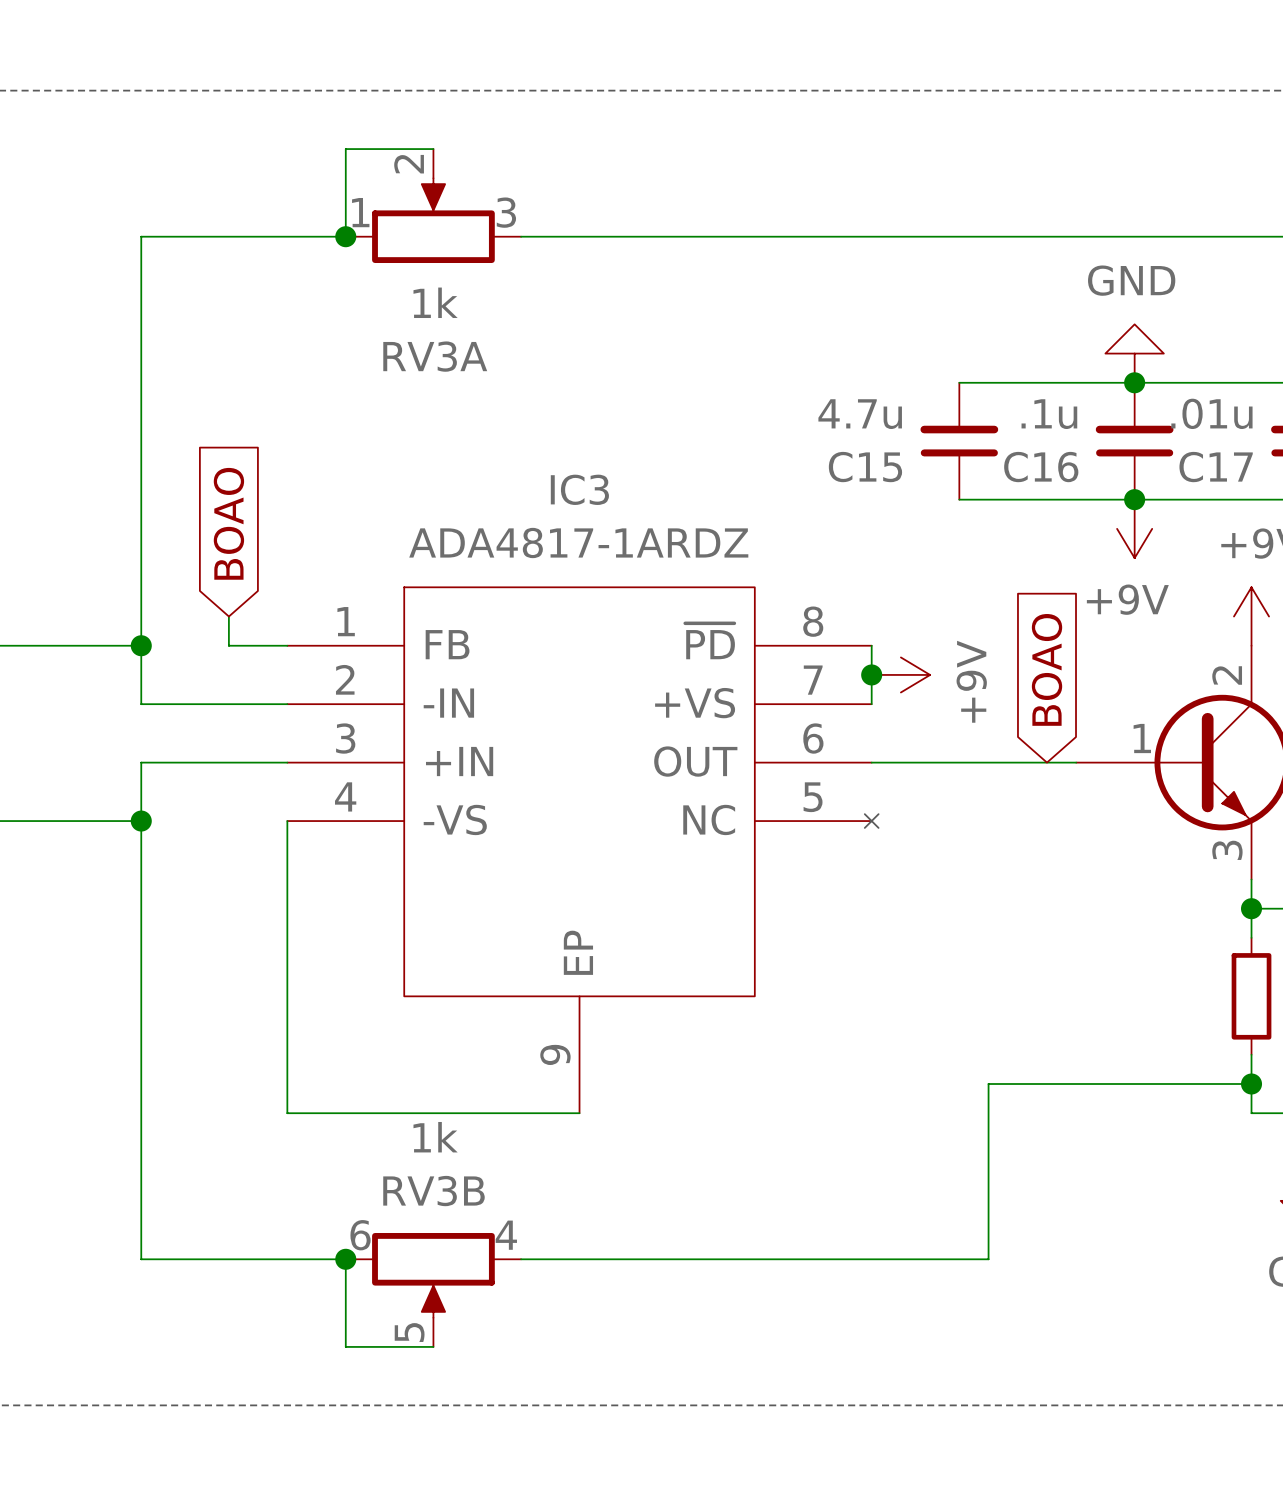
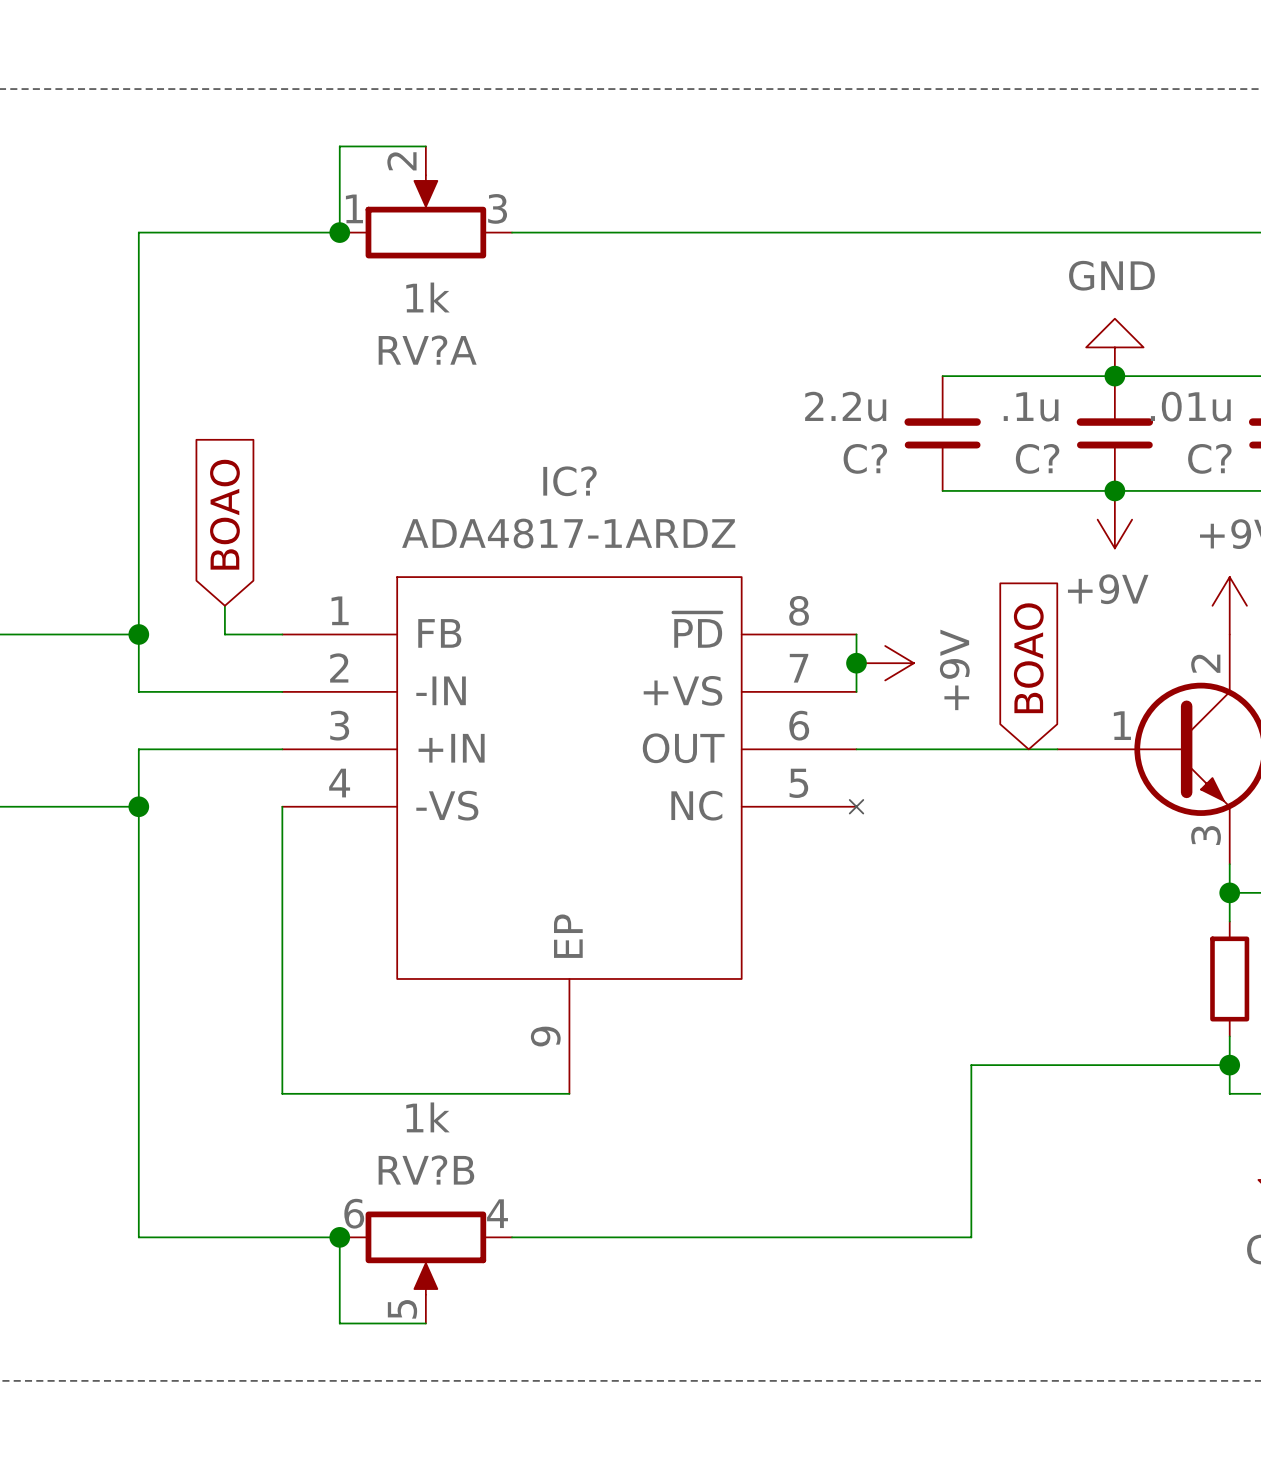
RV3A name: RV3A (435, 356) -> RV?A (427, 350)
C15 value: 4.7u (860, 414) -> 2.2u (845, 406)
C15 name: C15 (865, 467) -> C? (865, 458)
C16 name: C16 (1041, 467) -> C? (1037, 458)
C17 name: C17 (1216, 467) -> C? (1209, 458)
IC3 name: IC3 (579, 489) -> IC? (569, 481)
RV3B name: RV3B (433, 1191) -> RV?B (426, 1170)

